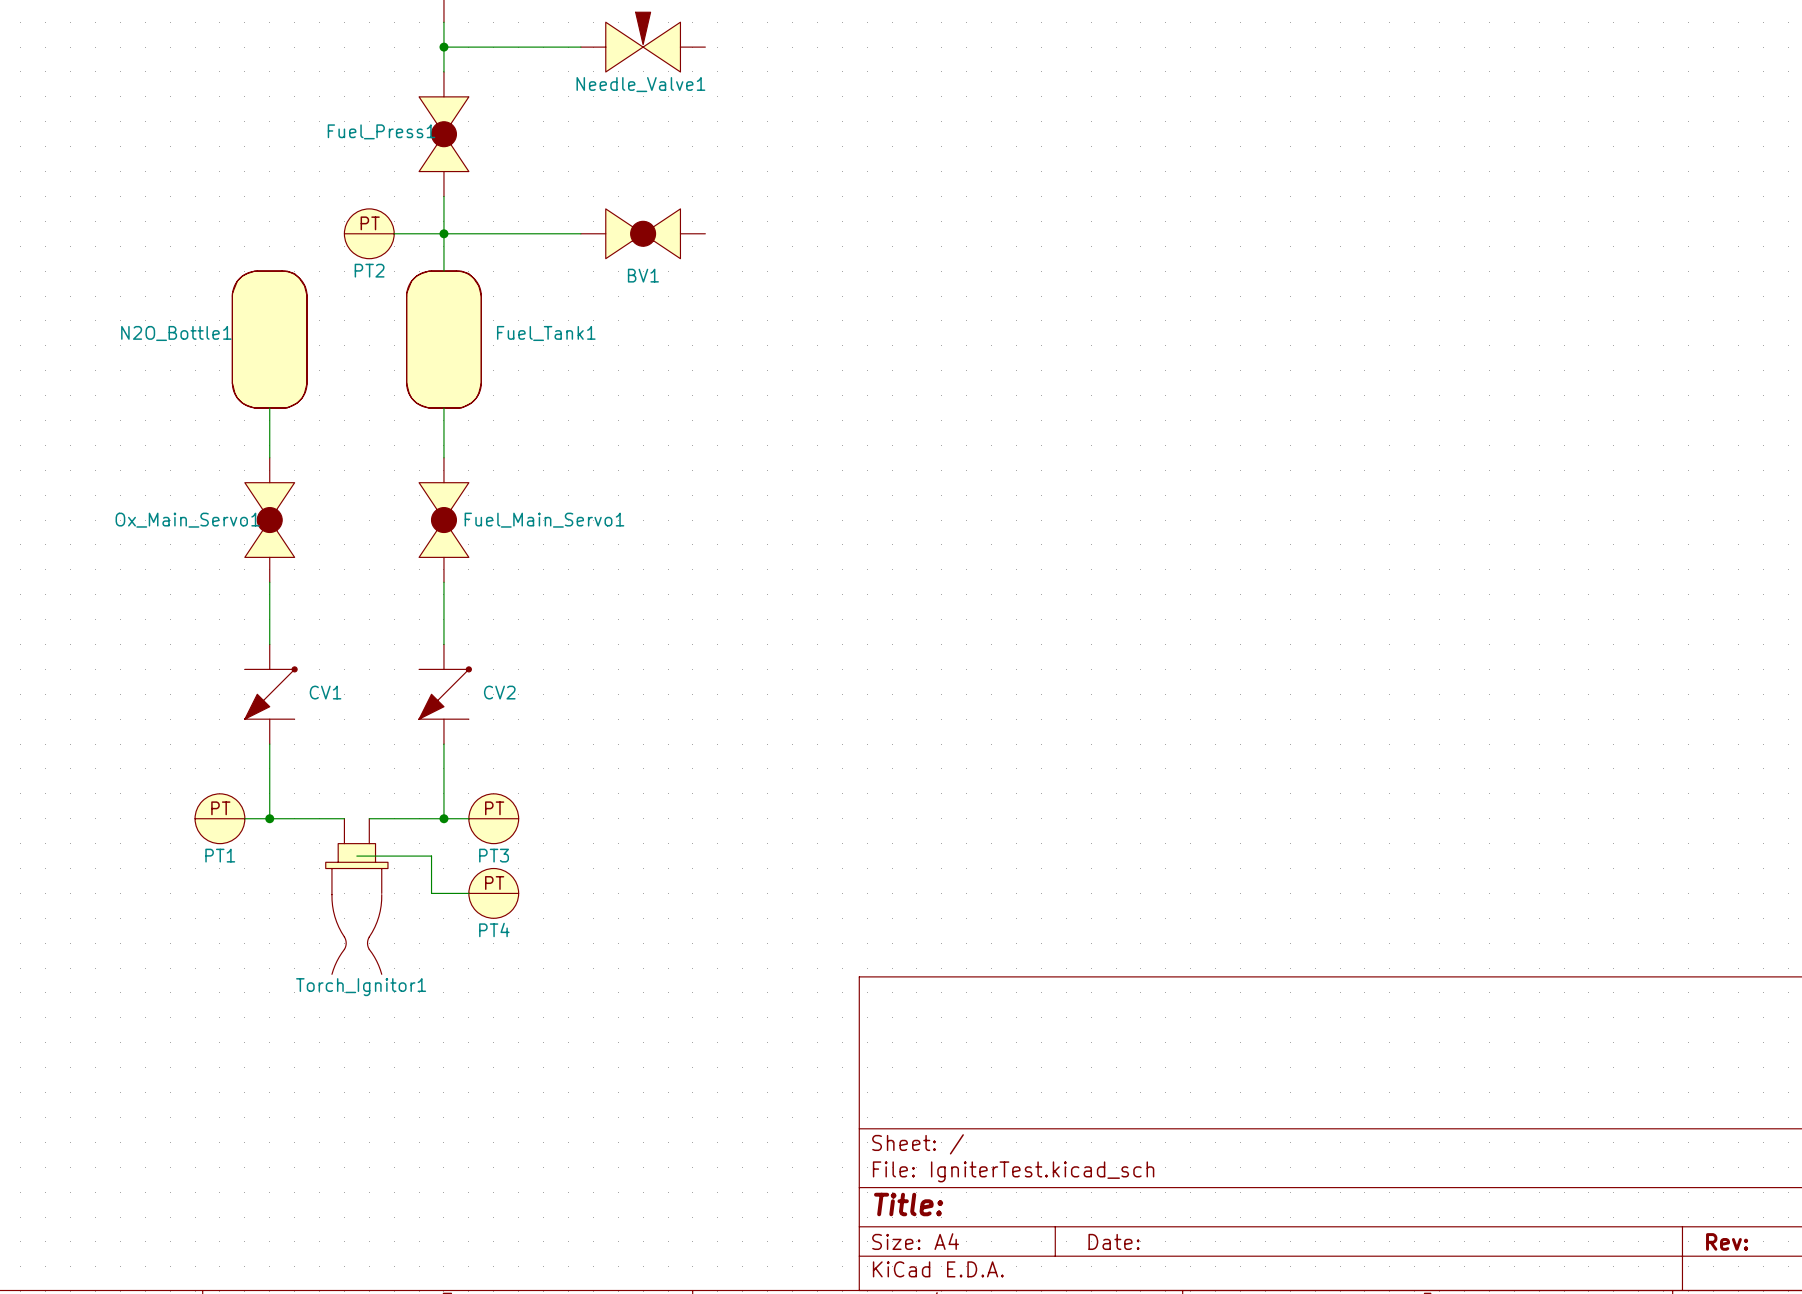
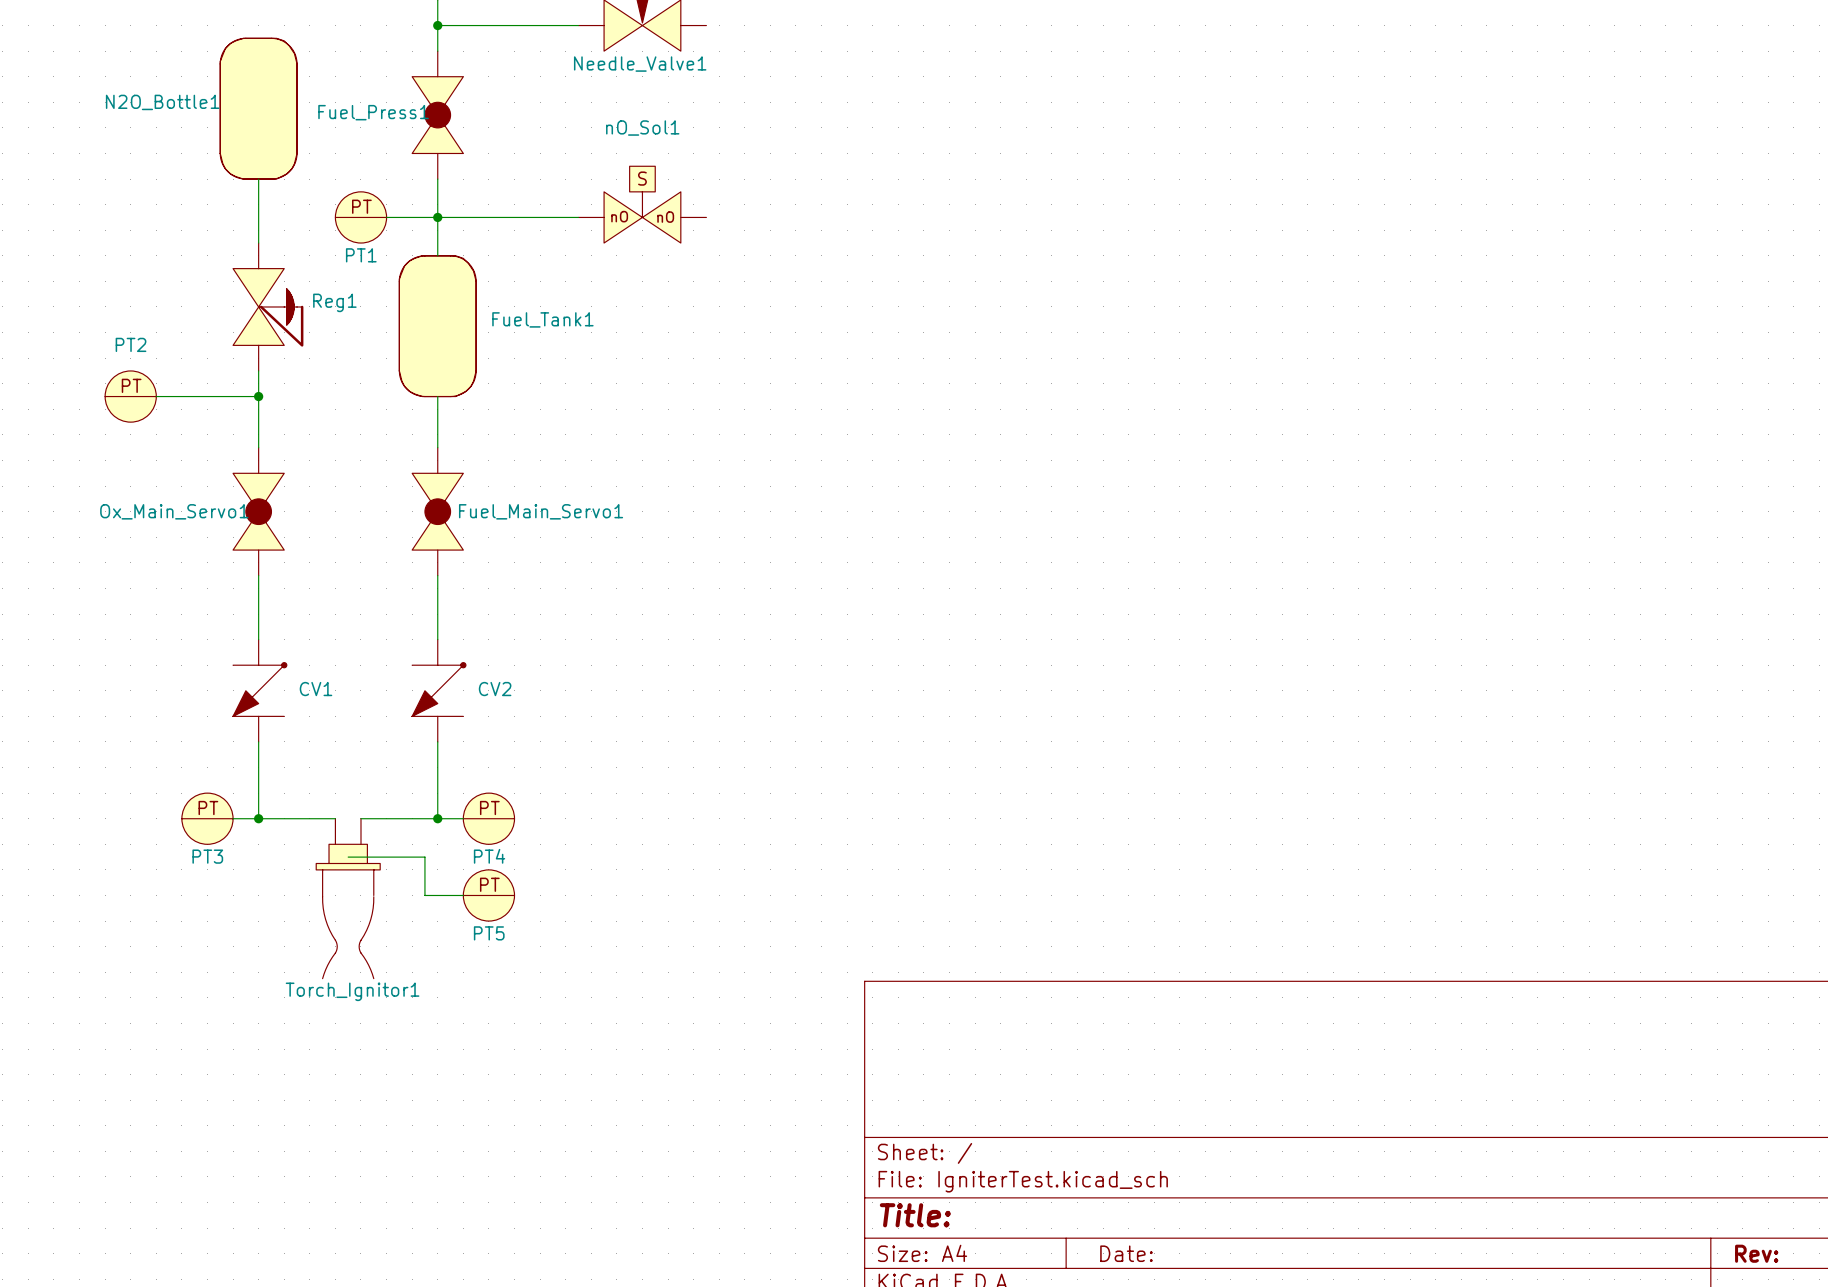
wire: none -> (258, 179) (258, 243)
nO_Sol1: none -> (642, 204)
BV1: (643, 233) -> none
PT2 name: PT2 (369, 270) -> PT1 (361, 255)
Reg1: none -> (268, 306)
N2O_Bottle1 position: (269, 339) -> (258, 108)
wire: none -> (258, 370) (258, 396) (156, 396)
PT2: none -> (130, 396)
junction: none -> (258, 396)
PT1 name: PT1 (220, 855) -> PT3 (207, 856)
PT3 name: PT3 (494, 855) -> PT4 (489, 856)
PT4 name: PT4 (494, 929) -> PT5 (489, 933)

